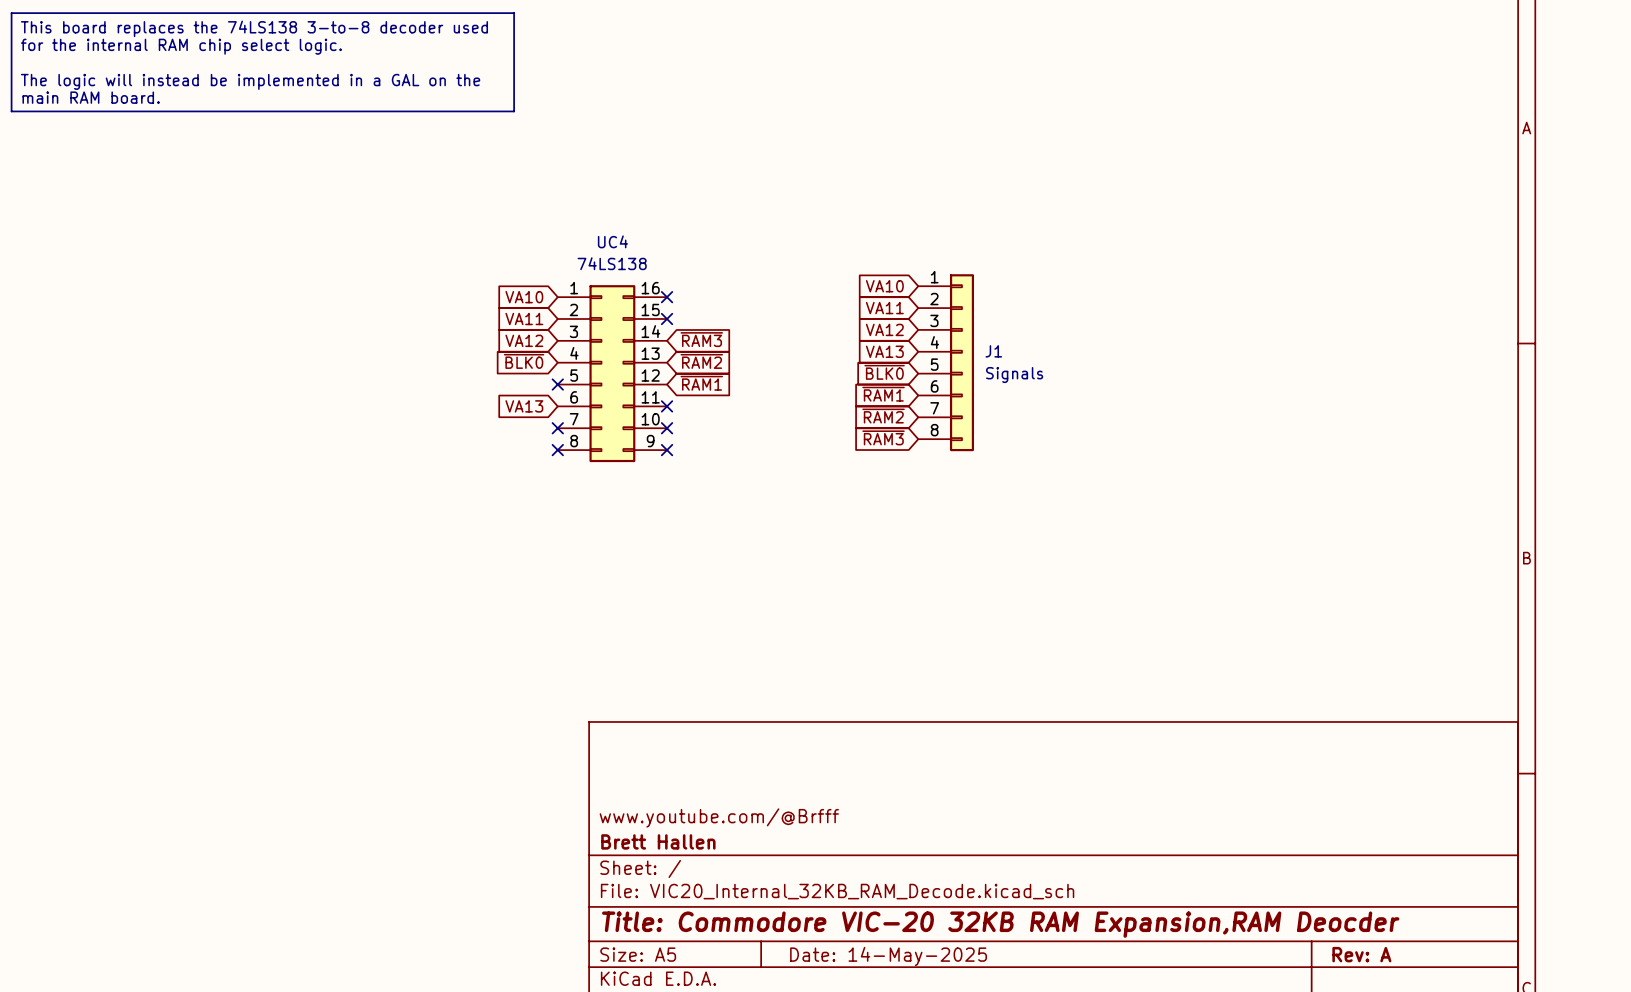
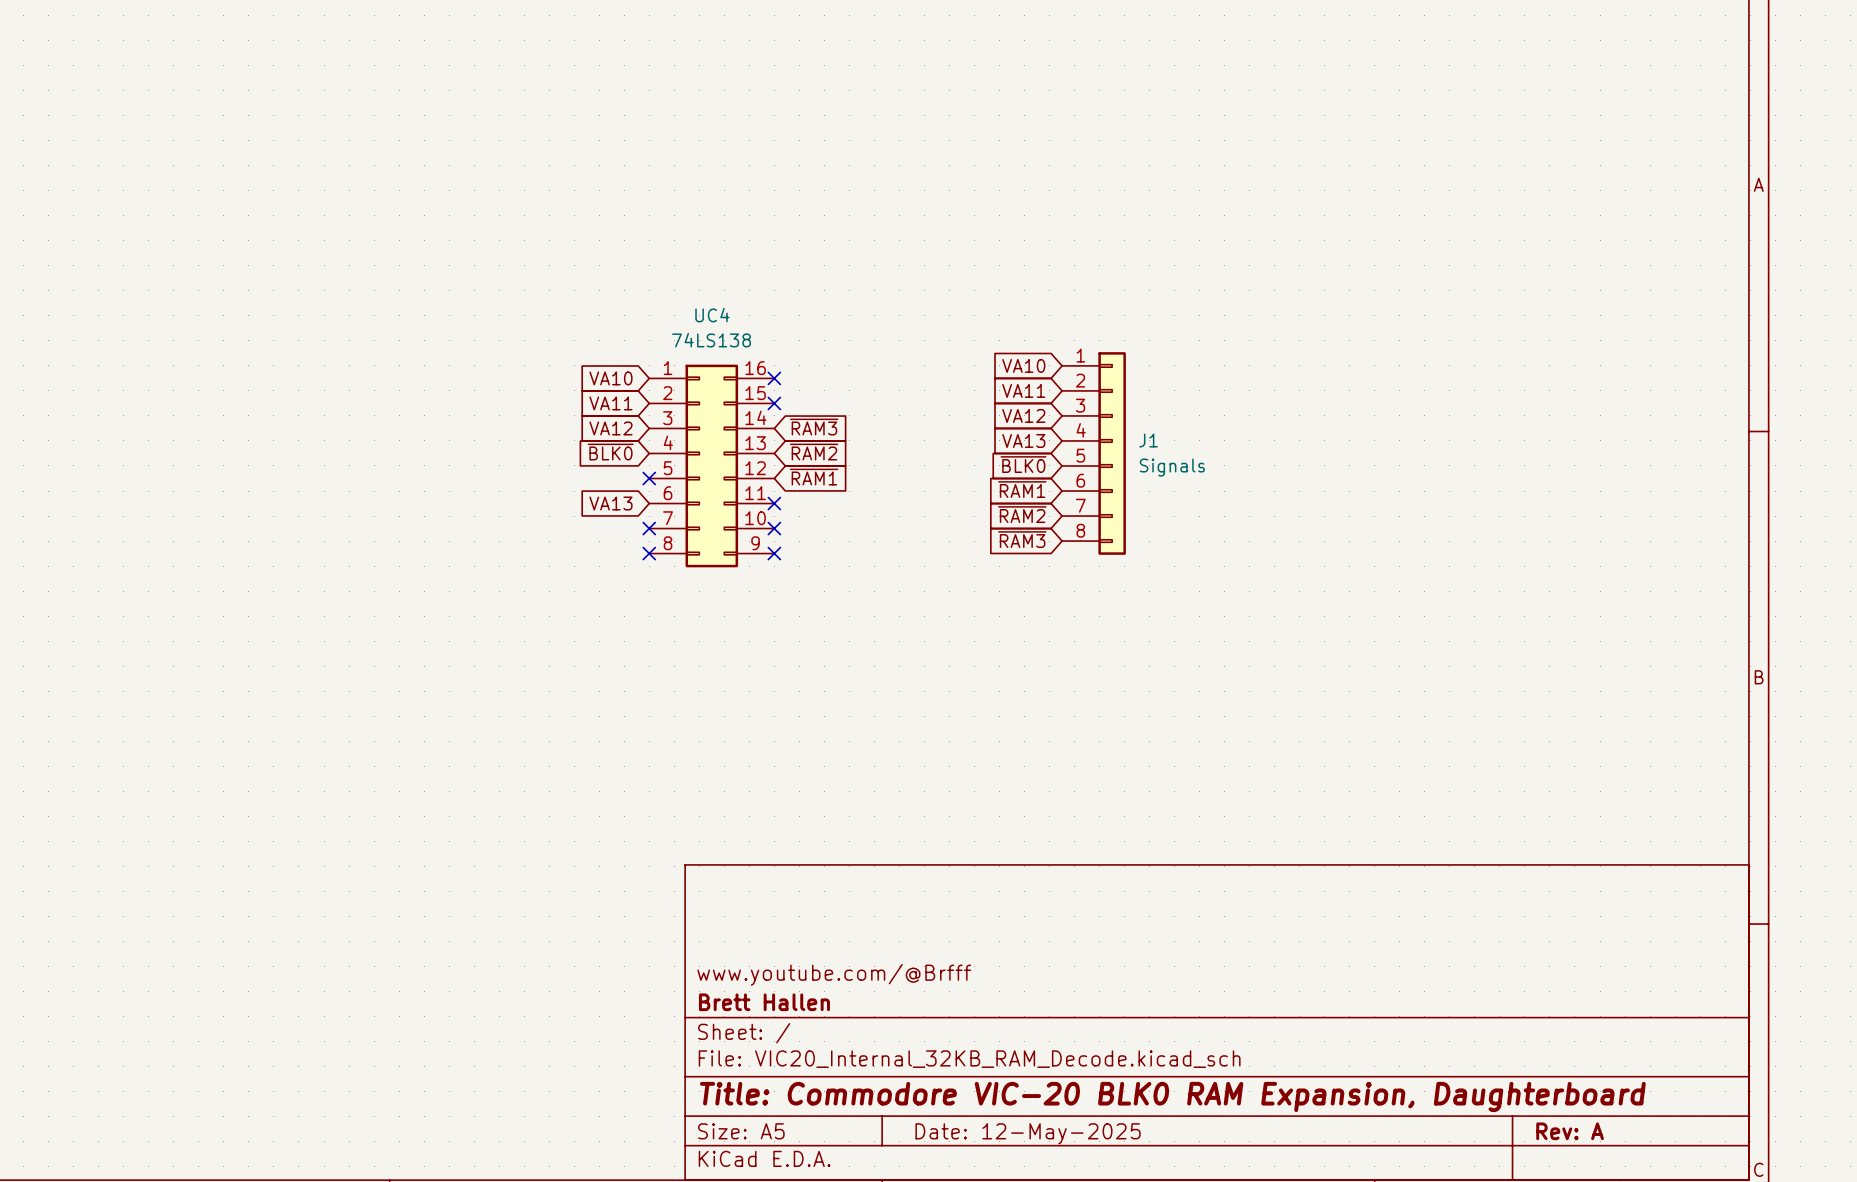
line: (11, 13) (514, 13) (514, 111) (11, 111) (11, 13) -> none
text: This board replaces the 74LS138 3-to-8 decoder used (254, 28) -> none
text: for the internal RAM chip select logic. (181, 46) -> none
text: The logic will instead be implemented in a GAL on the (250, 81) -> none
text: main RAM board. (91, 97) -> none
title block: Title: Commodore VIC-20 32KB RAM Expansion,RAM Deocder (1000, 924) -> Title: Commodore VIC-20 BLK0 RAM Expansion, Daughterboard (1172, 1096)
title block: Date: 14-May-2025 (888, 956) -> Date: 12-May-2025 (1028, 1133)

